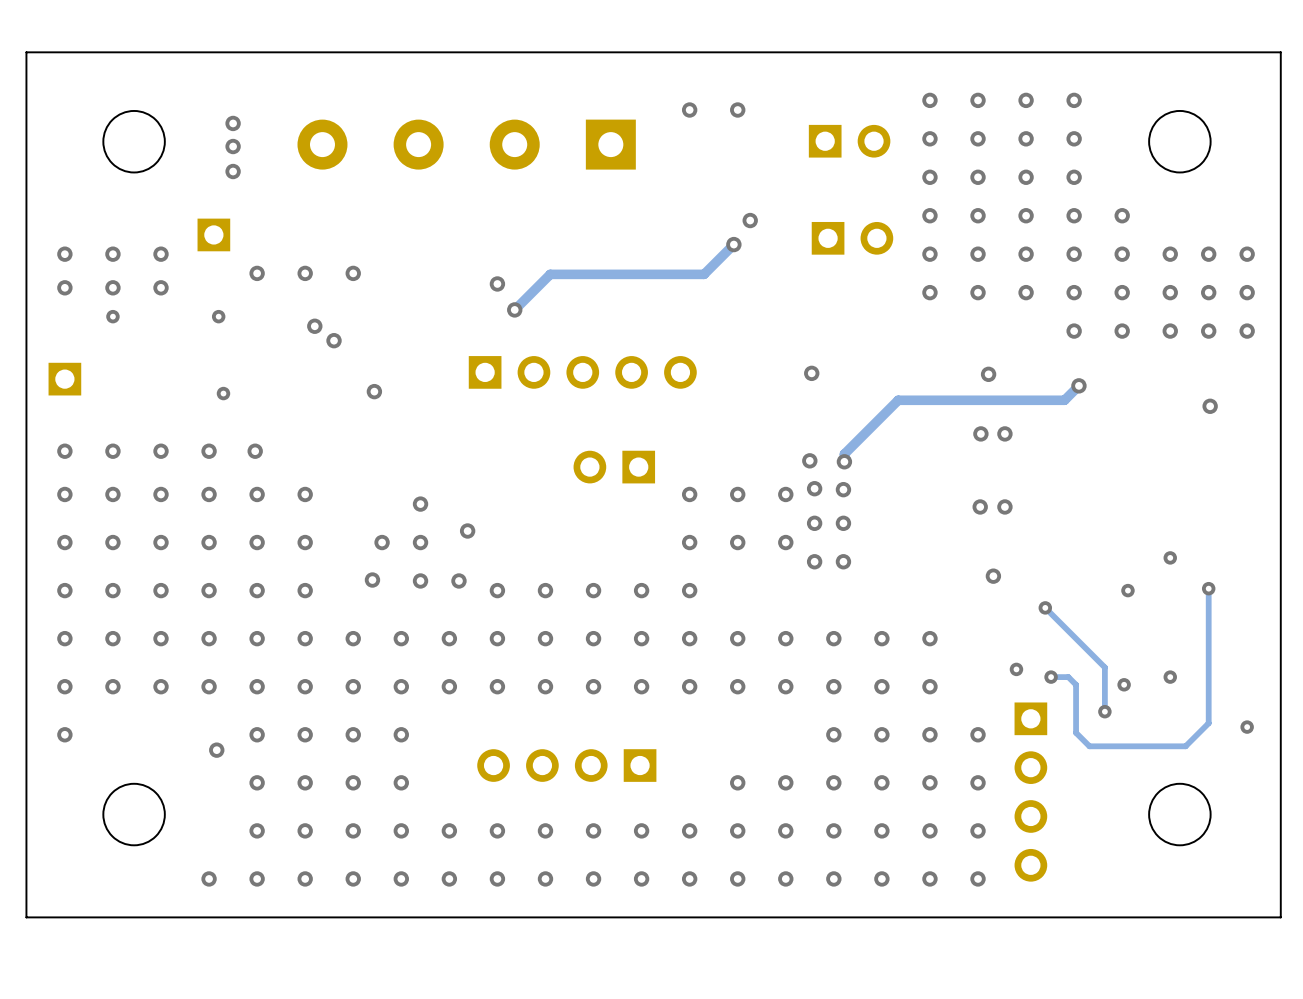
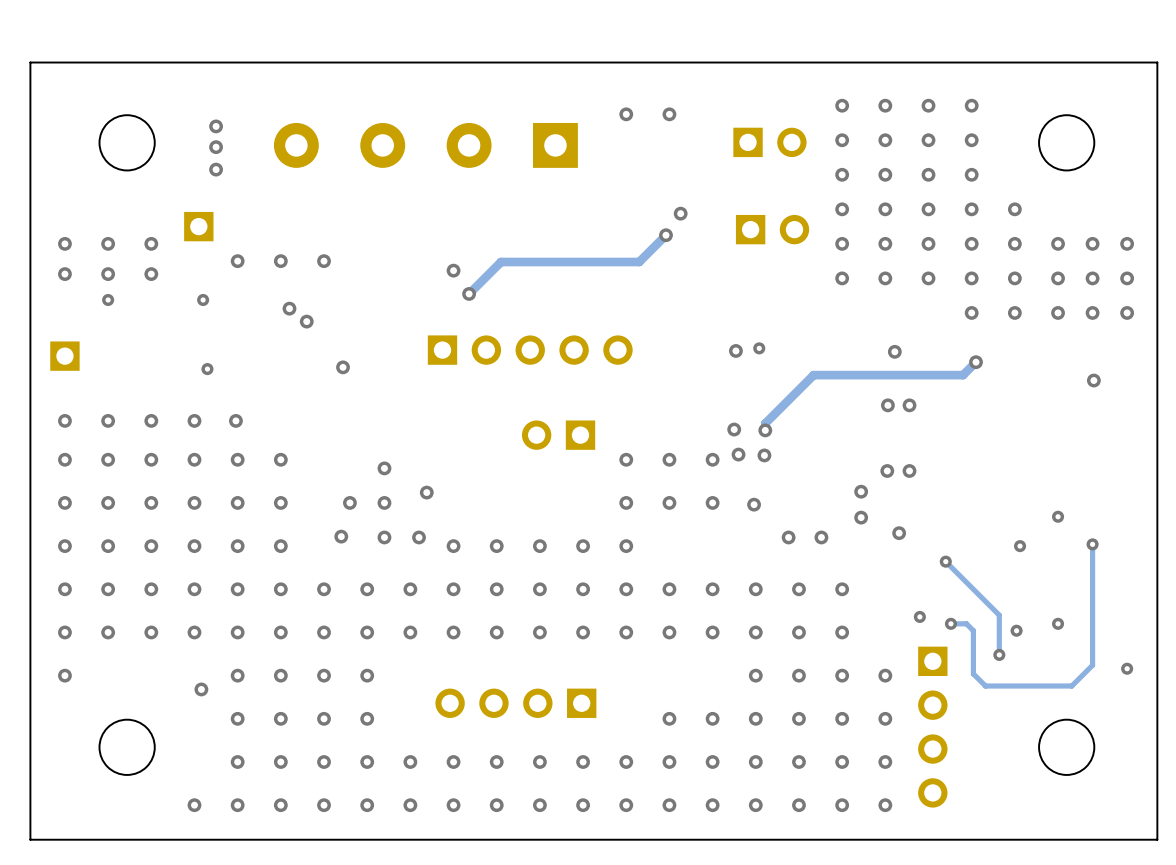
via: none -> (759, 348)
via: (814, 523) -> none
via: (843, 523) -> none
via: none -> (861, 491)
via: none -> (754, 504)
via: none -> (861, 517)
via: (814, 561) -> none
via: (843, 561) -> none
via: none -> (788, 537)
via: none -> (821, 537)

